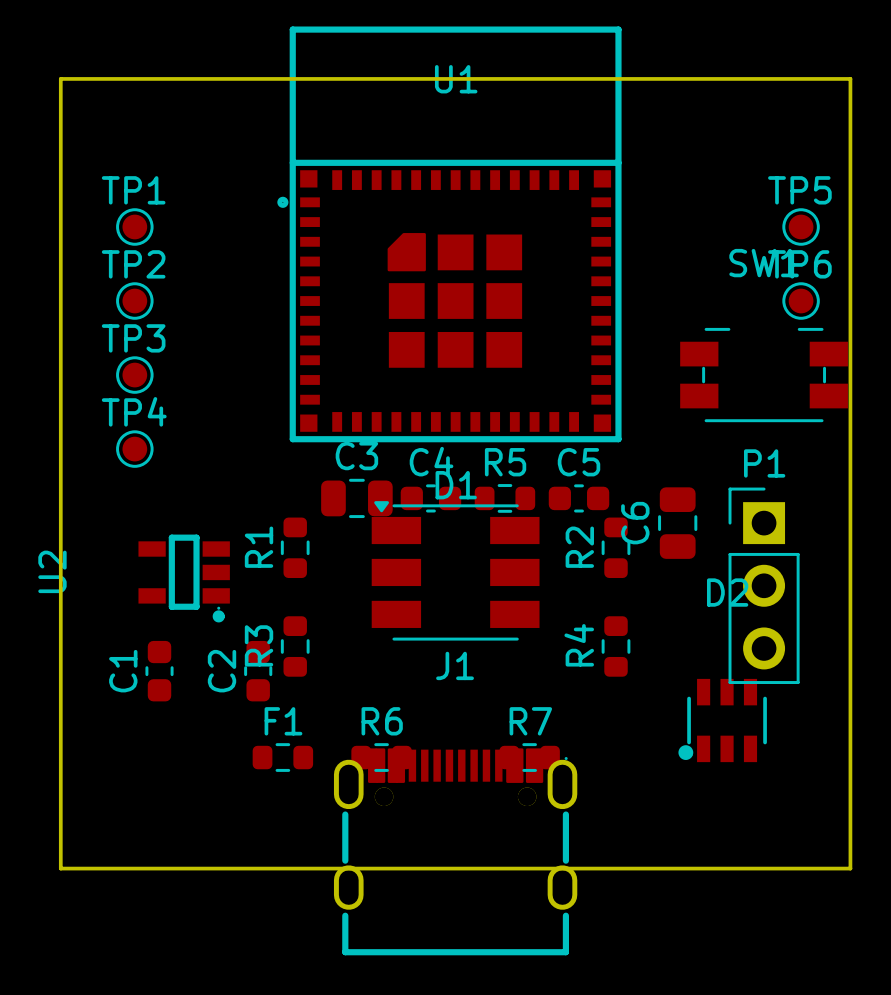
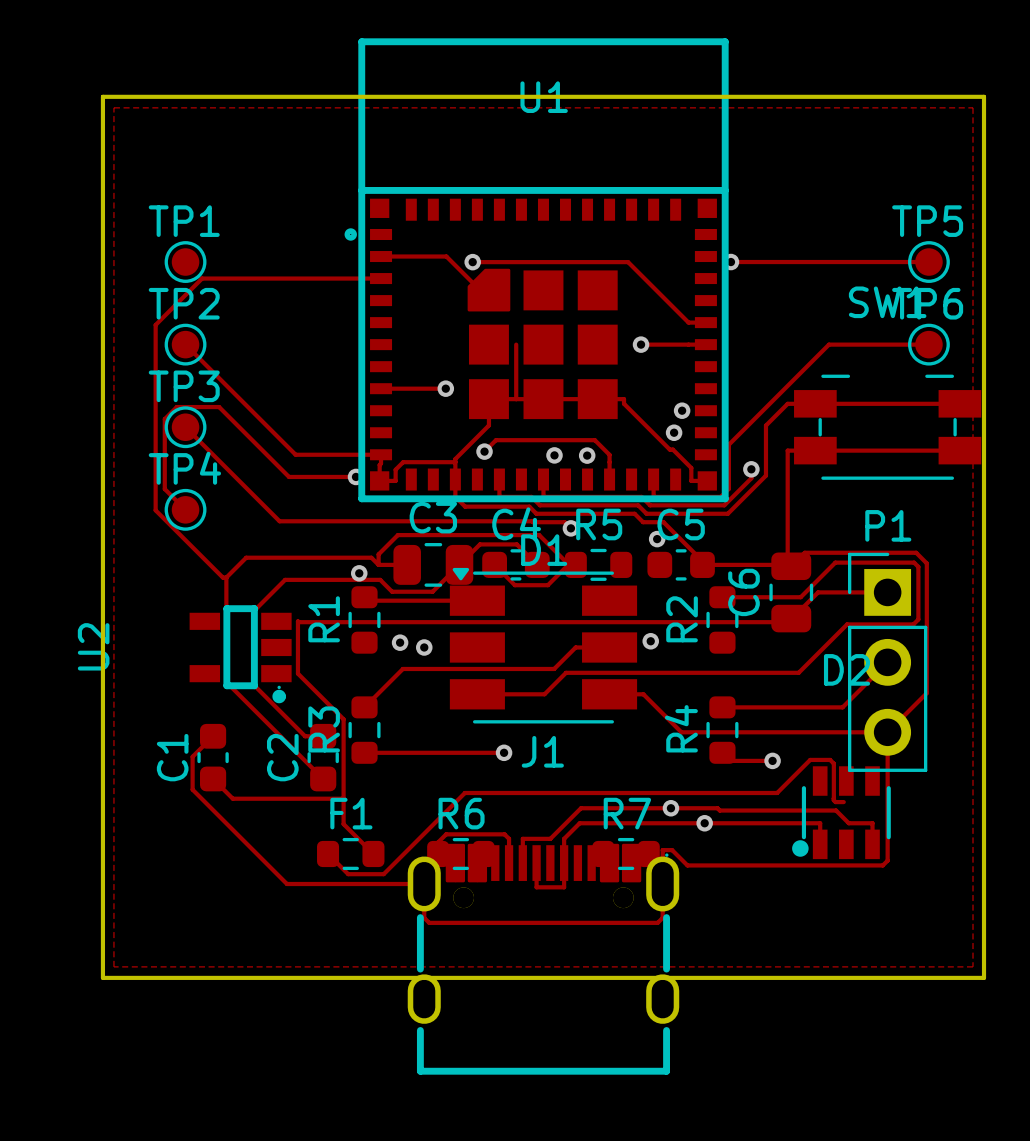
zone outline: none -> (113, 107) (973, 107) (973, 966) (113, 966) (113, 107)
track: none -> (381, 256) (446, 256) (480, 290) (488, 290)
track: none -> (730, 262) (928, 262)
via: none -> (730, 262)
track: none -> (472, 262) (628, 262) (688, 322) (705, 322)
via: none -> (472, 262)
track: none -> (381, 278) (202, 278) (155, 324) (155, 510) (222, 577) (226, 577)
track: none -> (185, 344) (295, 454) (381, 454) (379, 480) (395, 480) (395, 469) (403, 462) (455, 462)
track: none -> (516, 344) (516, 399)
track: none -> (641, 344) (705, 344)
via: none -> (641, 344)
track: none -> (928, 344) (828, 344) (728, 444) (728, 488) (720, 496) (653, 496) (653, 479)
track: none -> (381, 388) (445, 388)
via: none -> (445, 388)
track: none -> (959, 403) (787, 403) (765, 425) (765, 475) (727, 513) (646, 513) (638, 505) (539, 505) (531, 496) (499, 496) (499, 479)
via: none -> (682, 410)
track: none -> (185, 427) (279, 521) (532, 521) (564, 522) (570, 528)
via: none -> (674, 432)
track: none -> (484, 451) (495, 440) (594, 440) (609, 454) (609, 479)
via: none -> (484, 451)
track: none -> (959, 450) (787, 450) (787, 564)
via: none -> (554, 455)
via: none -> (587, 455)
track: none -> (751, 469) (751, 478) (724, 505) (650, 505) (641, 496) (543, 496) (543, 479)
via: none -> (751, 469)
track: none -> (356, 476) (289, 476) (219, 407) (176, 407) (164, 419) (164, 489) (185, 509)
via: none -> (356, 476)
track: none -> (707, 480) (691, 480) (691, 468) (672, 449) (669, 449) (624, 403) (624, 399) (488, 399) (488, 425) (455, 459) (455, 496) (465, 506) (529, 506) (536, 513) (634, 513) (643, 522) (663, 522) (702, 561) (702, 564) (791, 566) (804, 552) (916, 552) (926, 563) (926, 693) (887, 732)
via: none -> (570, 528)
via: none -> (657, 539)
track: none -> (378, 564) (407, 564)
track: none -> (378, 564) (371, 557) (246, 557) (226, 577)
track: none -> (378, 564) (378, 554) (397, 535) (539, 535) (568, 564) (575, 564)
track: none -> (537, 564) (516, 544) (479, 544) (432, 591) (392, 591) (380, 579) (285, 579) (254, 610) (254, 686) (305, 736) (323, 736)
track: none -> (568, 564) (547, 585) (514, 585) (494, 564)
via: none -> (359, 573)
track: none -> (226, 577) (226, 682) (323, 778)
track: none -> (887, 592) (818, 592) (787, 622) (297, 621) (297, 673) (343, 719) (343, 824) (373, 853)
track: none -> (364, 597) (367, 600) (477, 600)
track: none -> (722, 597) (800, 597) (835, 562) (914, 562) (918, 566) (918, 619) (913, 624) (847, 624) (798, 672) (566, 672) (544, 694) (477, 694)
via: none -> (650, 641)
via: none -> (400, 642)
via: none -> (424, 647)
track: none -> (609, 647) (575, 647) (554, 668) (402, 668) (364, 707)
track: none -> (887, 662) (842, 707) (722, 707)
track: none -> (609, 694) (643, 694) (681, 732) (887, 732)
track: none -> (887, 732) (887, 860) (882, 865) (687, 865) (672, 850) (662, 850) (662, 917) (657, 922) (429, 922) (424, 917) (424, 884) (286, 884) (192, 789) (192, 756) (213, 736)
track: none -> (364, 752) (504, 752)
via: none -> (504, 752)
track: none -> (722, 752) (730, 760) (772, 760)
via: none -> (772, 760)
track: none -> (213, 778) (232, 798) (343, 798)
track: none -> (833, 798) (833, 763) (830, 759) (810, 759) (777, 792) (464, 792) (383, 874) (348, 874) (328, 853)
track: none -> (833, 798) (835, 802) (843, 802)
via: none -> (670, 808)
via: none -> (704, 823)
track: none -> (820, 844) (820, 823) (579, 823) (564, 838) (564, 887) (536, 887) (536, 863)
track: none -> (872, 844) (872, 823) (848, 823) (836, 810) (580, 808) (550, 838) (522, 838) (522, 863)
track: none -> (438, 853) (438, 842) (446, 834) (504, 834) (509, 838) (509, 863)

